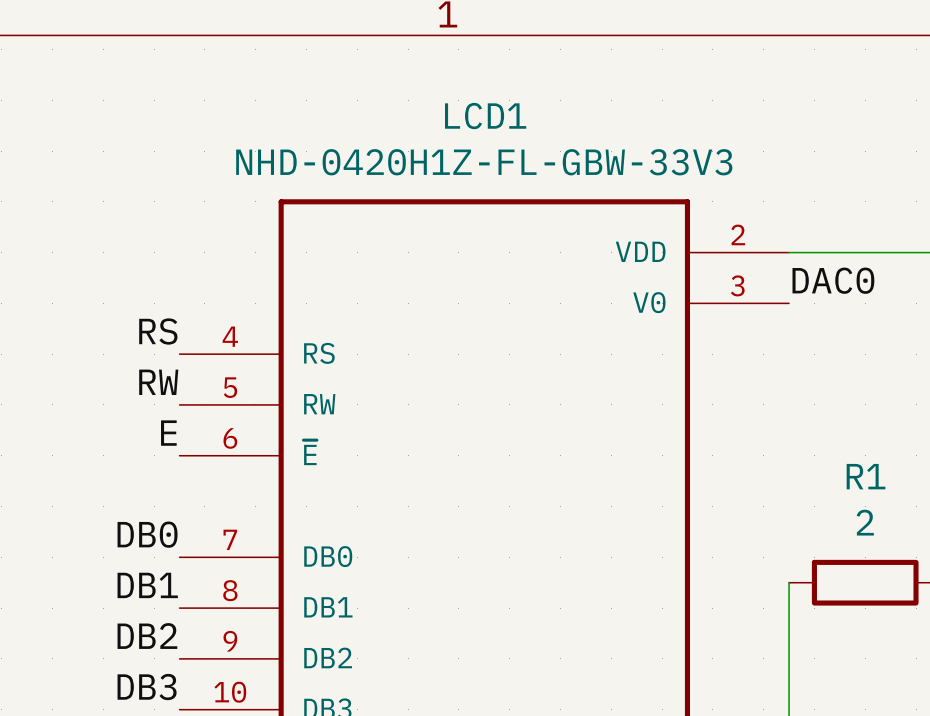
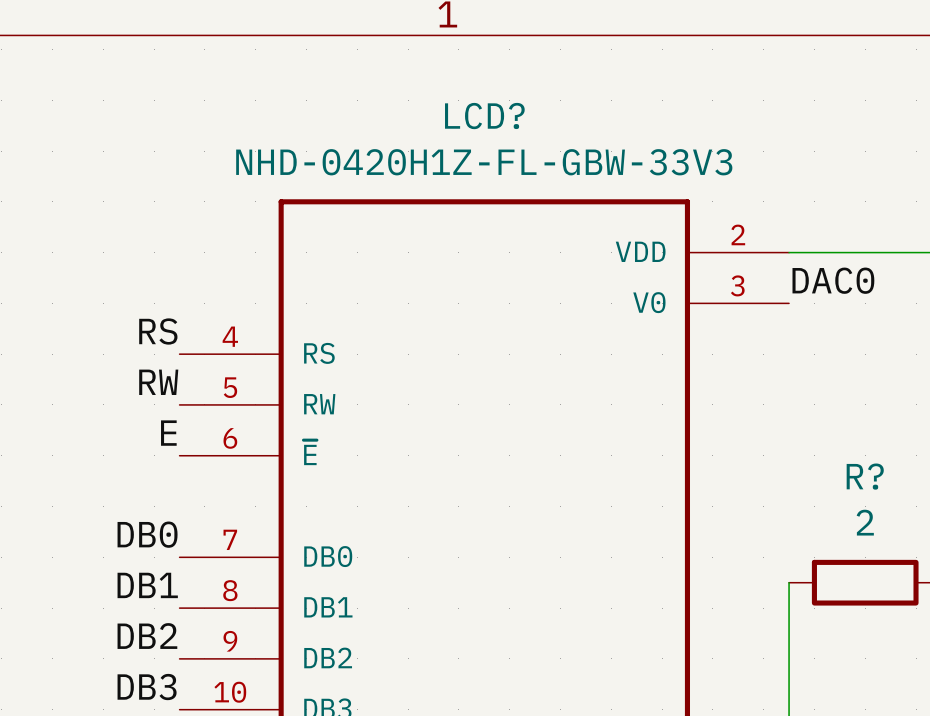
LCD1 name: LCD1 (485, 116) -> LCD? (484, 116)
R1 name: R1 (866, 476) -> R? (865, 476)

